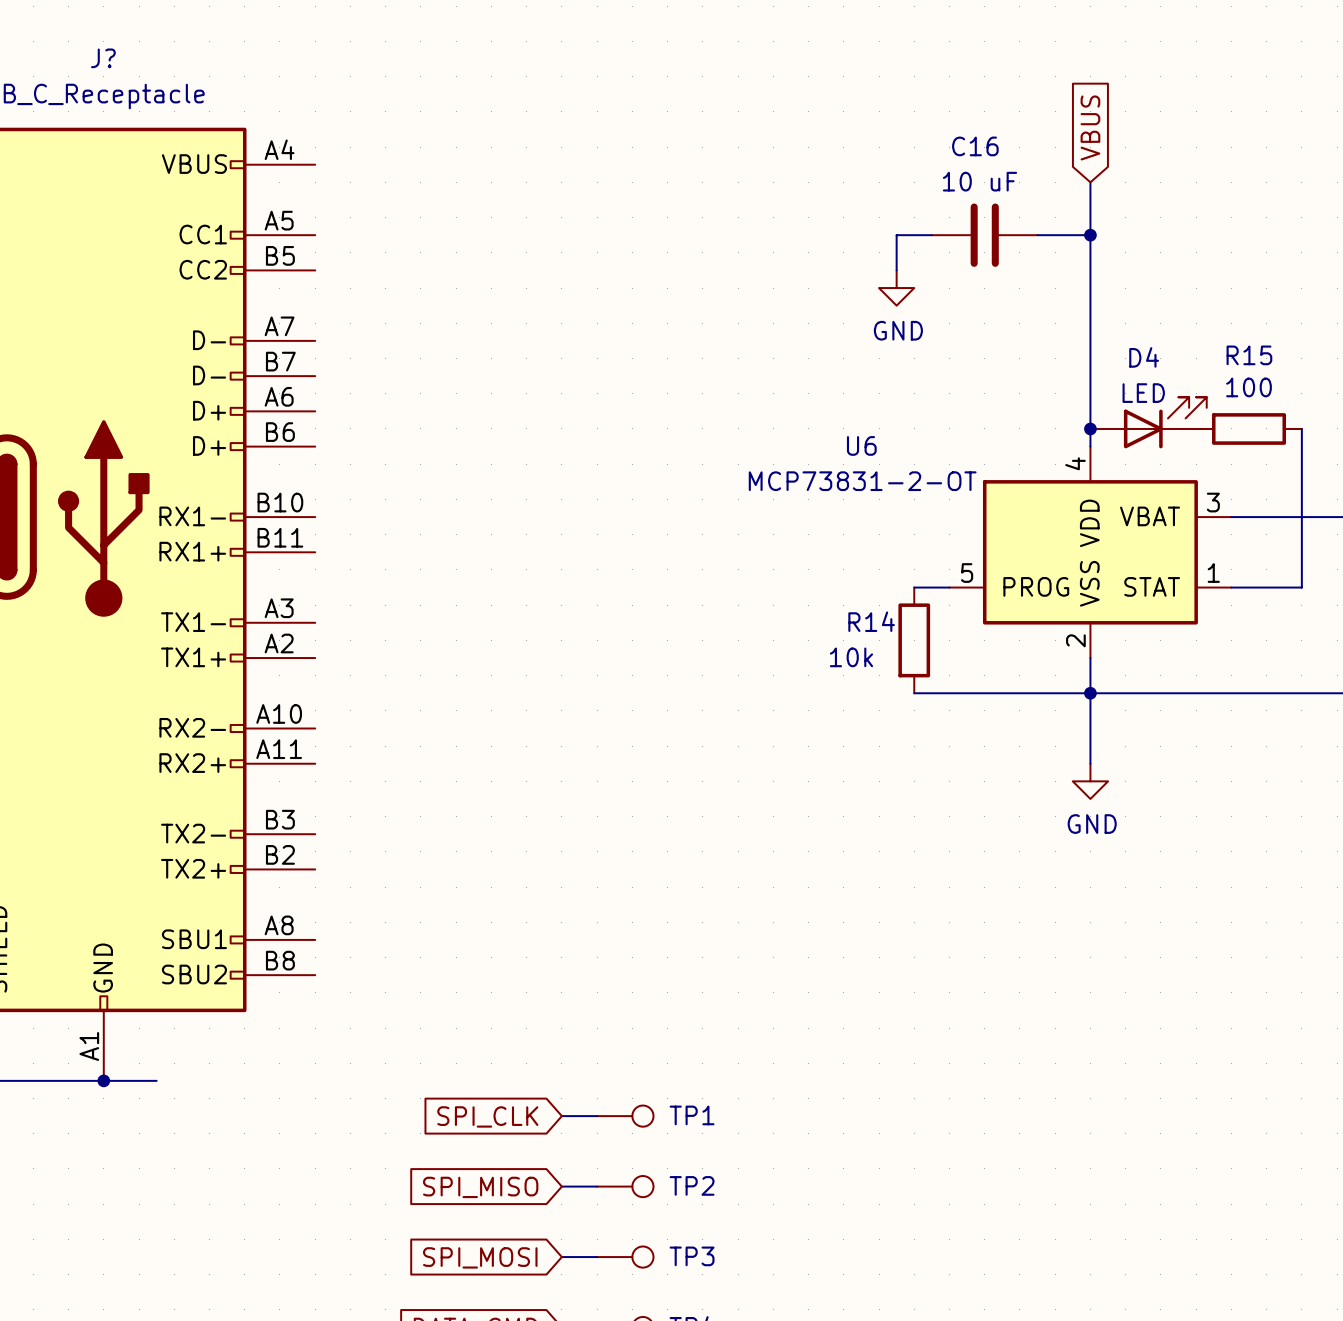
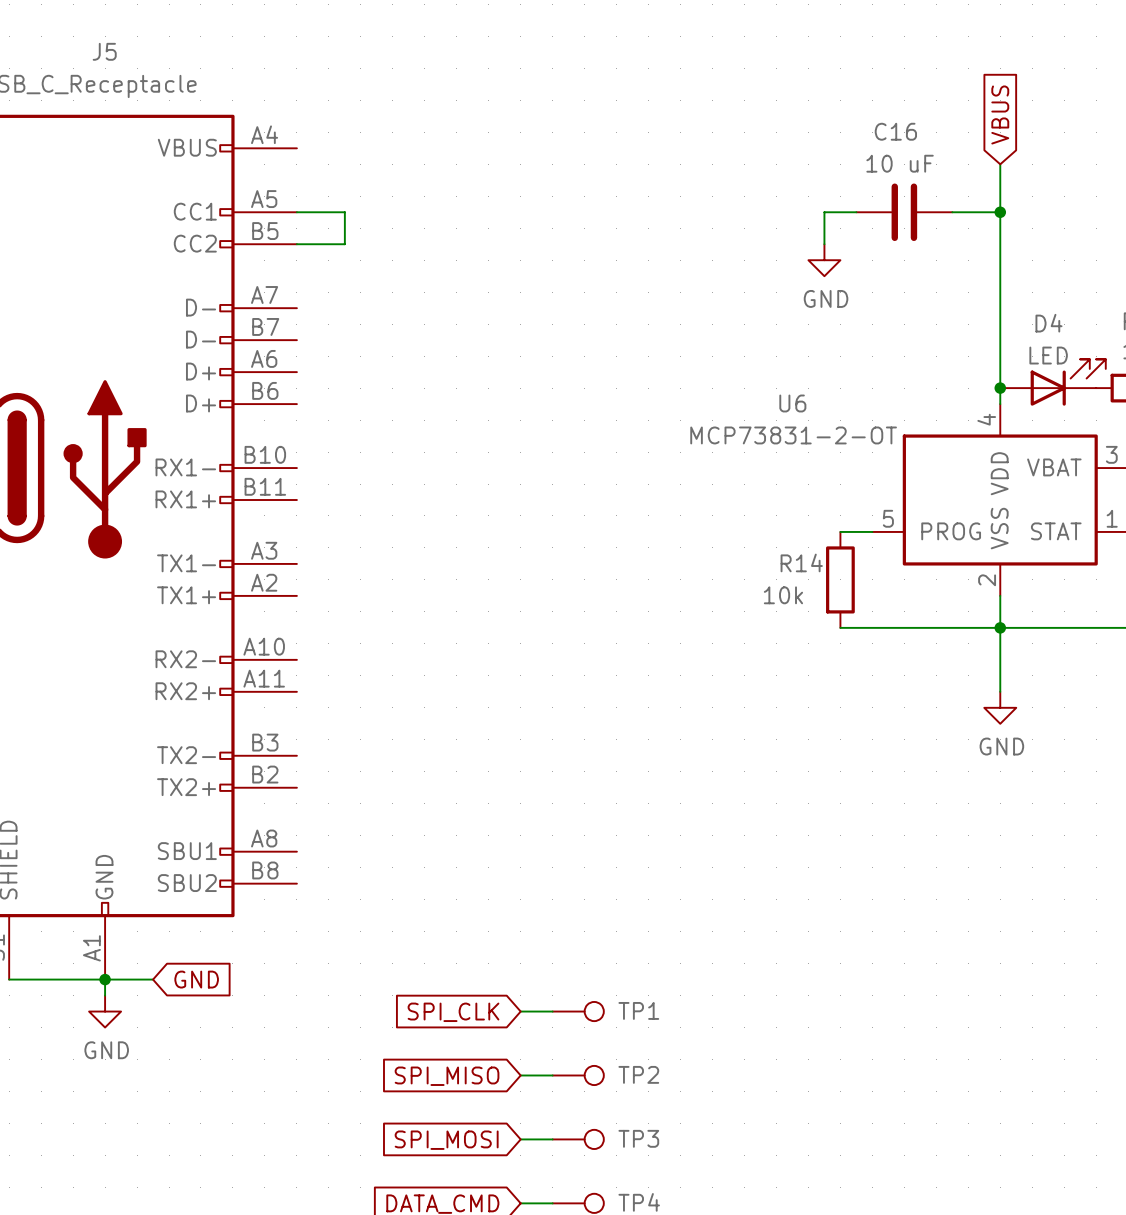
J? name: J? (103, 58) -> J5 (104, 51)
wire: none -> (296, 212) (344, 212) (344, 244) (296, 244)
wire: none -> (105, 979) (105, 995)
global label: none -> GND (196, 979)
power symbol: none -> GND (105, 1011)

